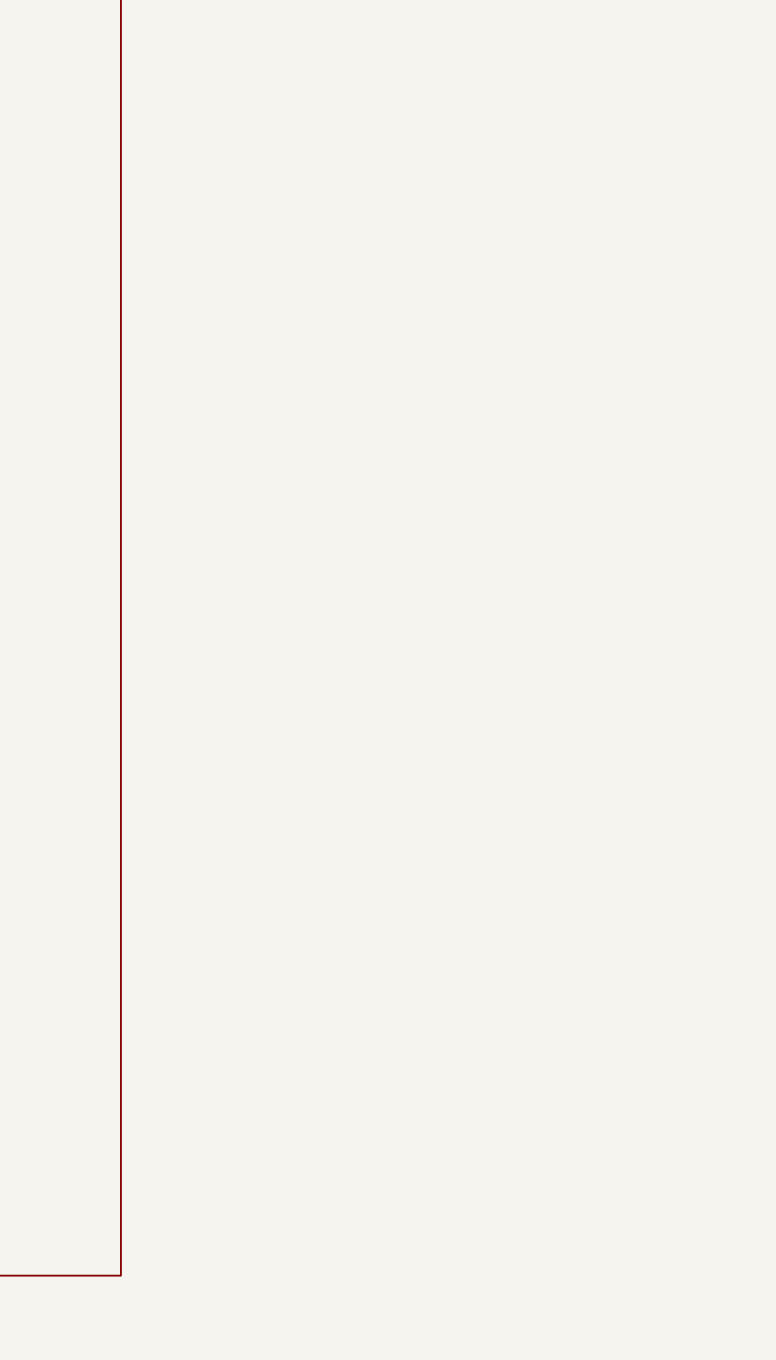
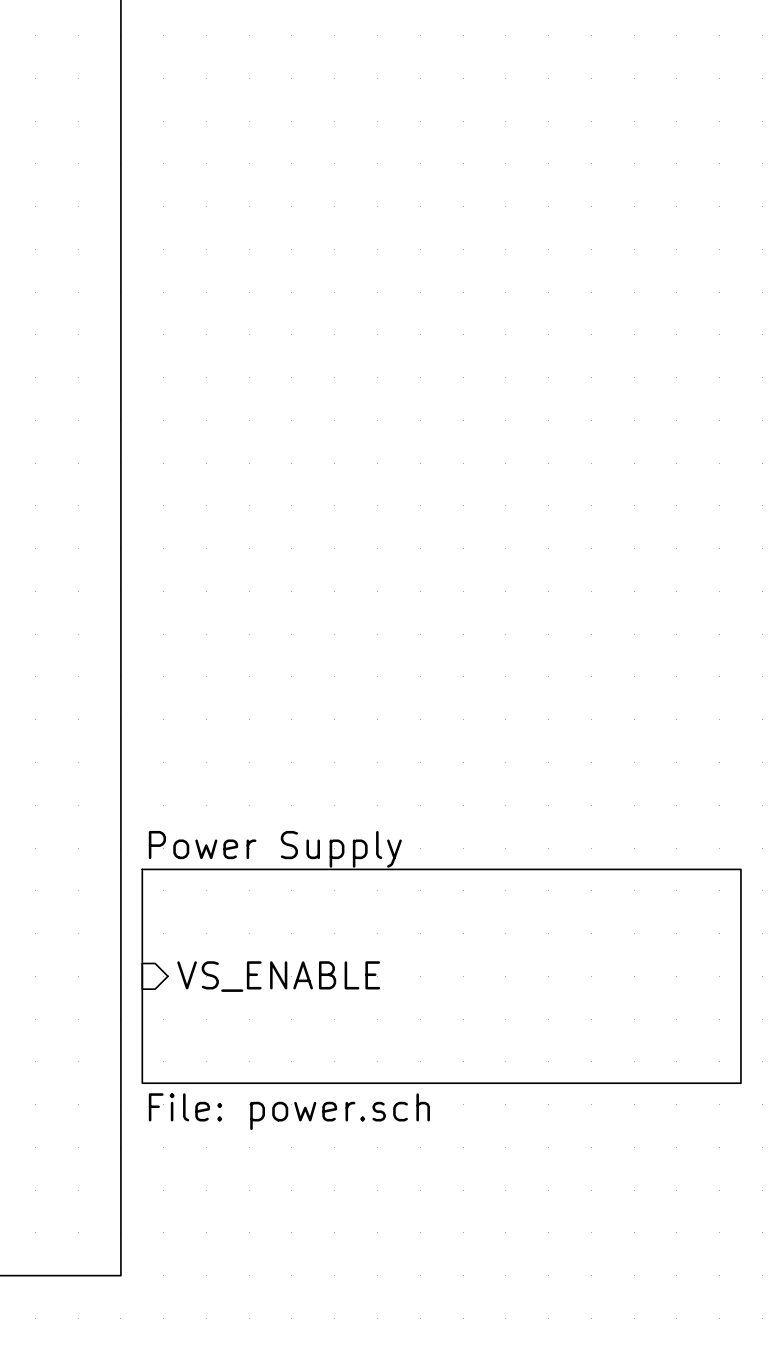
sheet pin: none -> VS_ENABLE (278, 976)
sheet Power Supply: none -> File: power.sch (441, 976)

